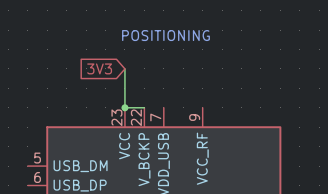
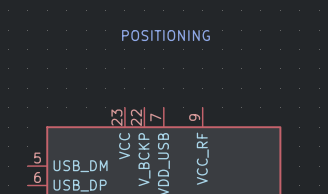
global label: 3V3 (99, 68) -> none
wire: (124, 68) (124, 107) (144, 107) -> none
junction: (124, 107) -> none

